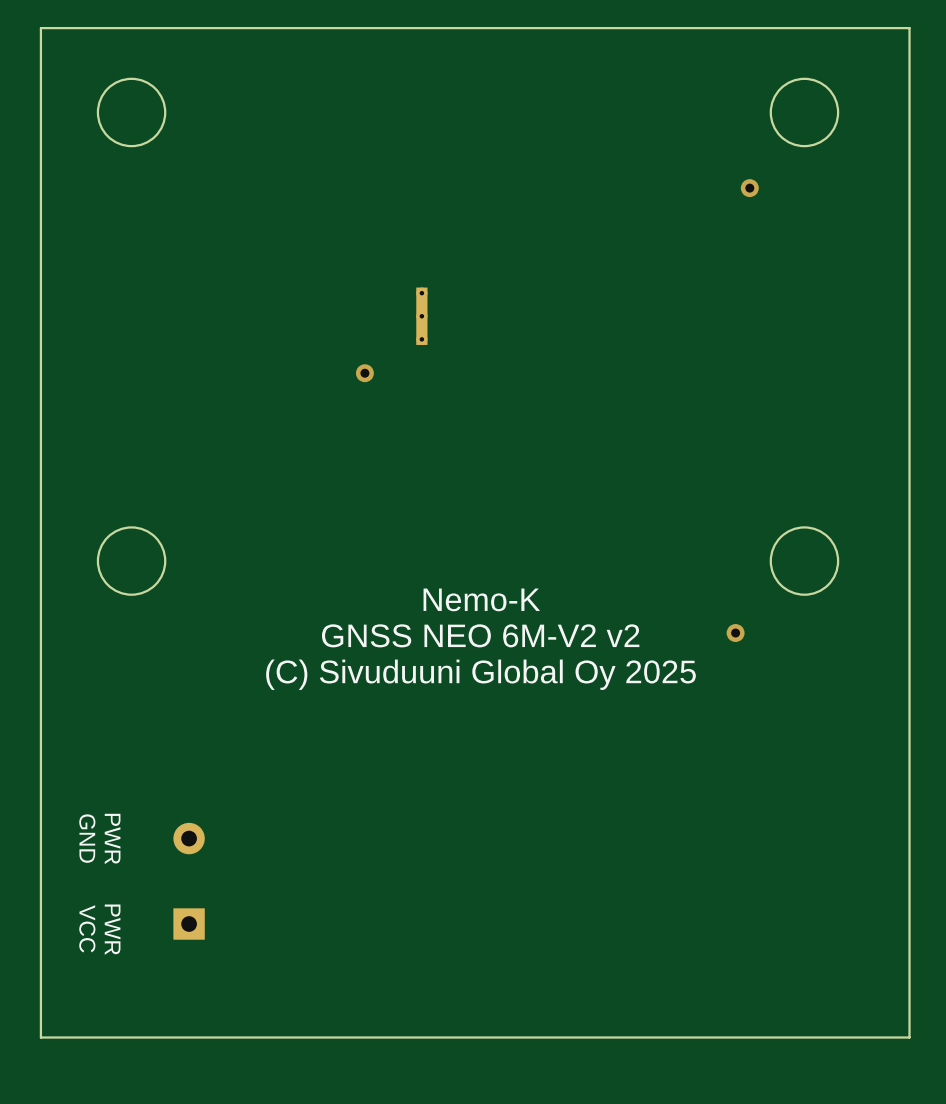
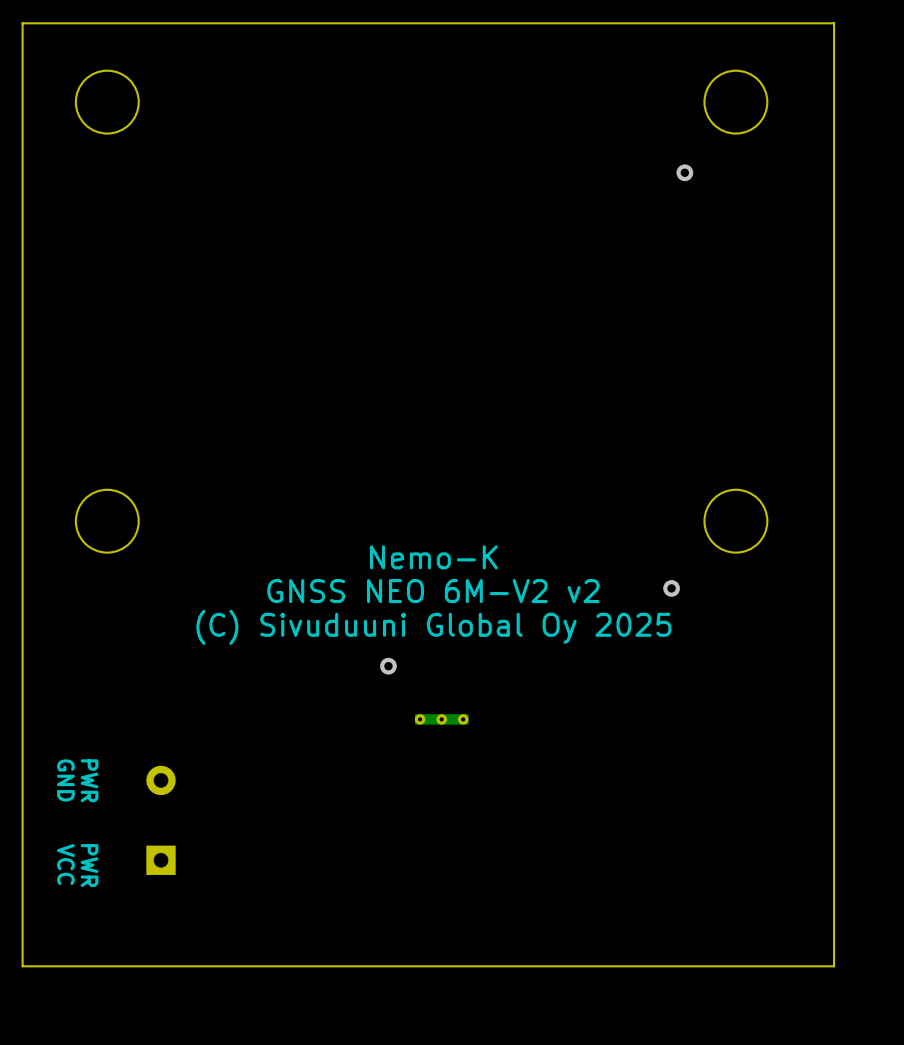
part rotation: 0° (421, 316) -> 90° clockwise (441, 719)
part position: (421, 316) -> (441, 719)
via: (364, 373) -> none
via: none -> (388, 666)

